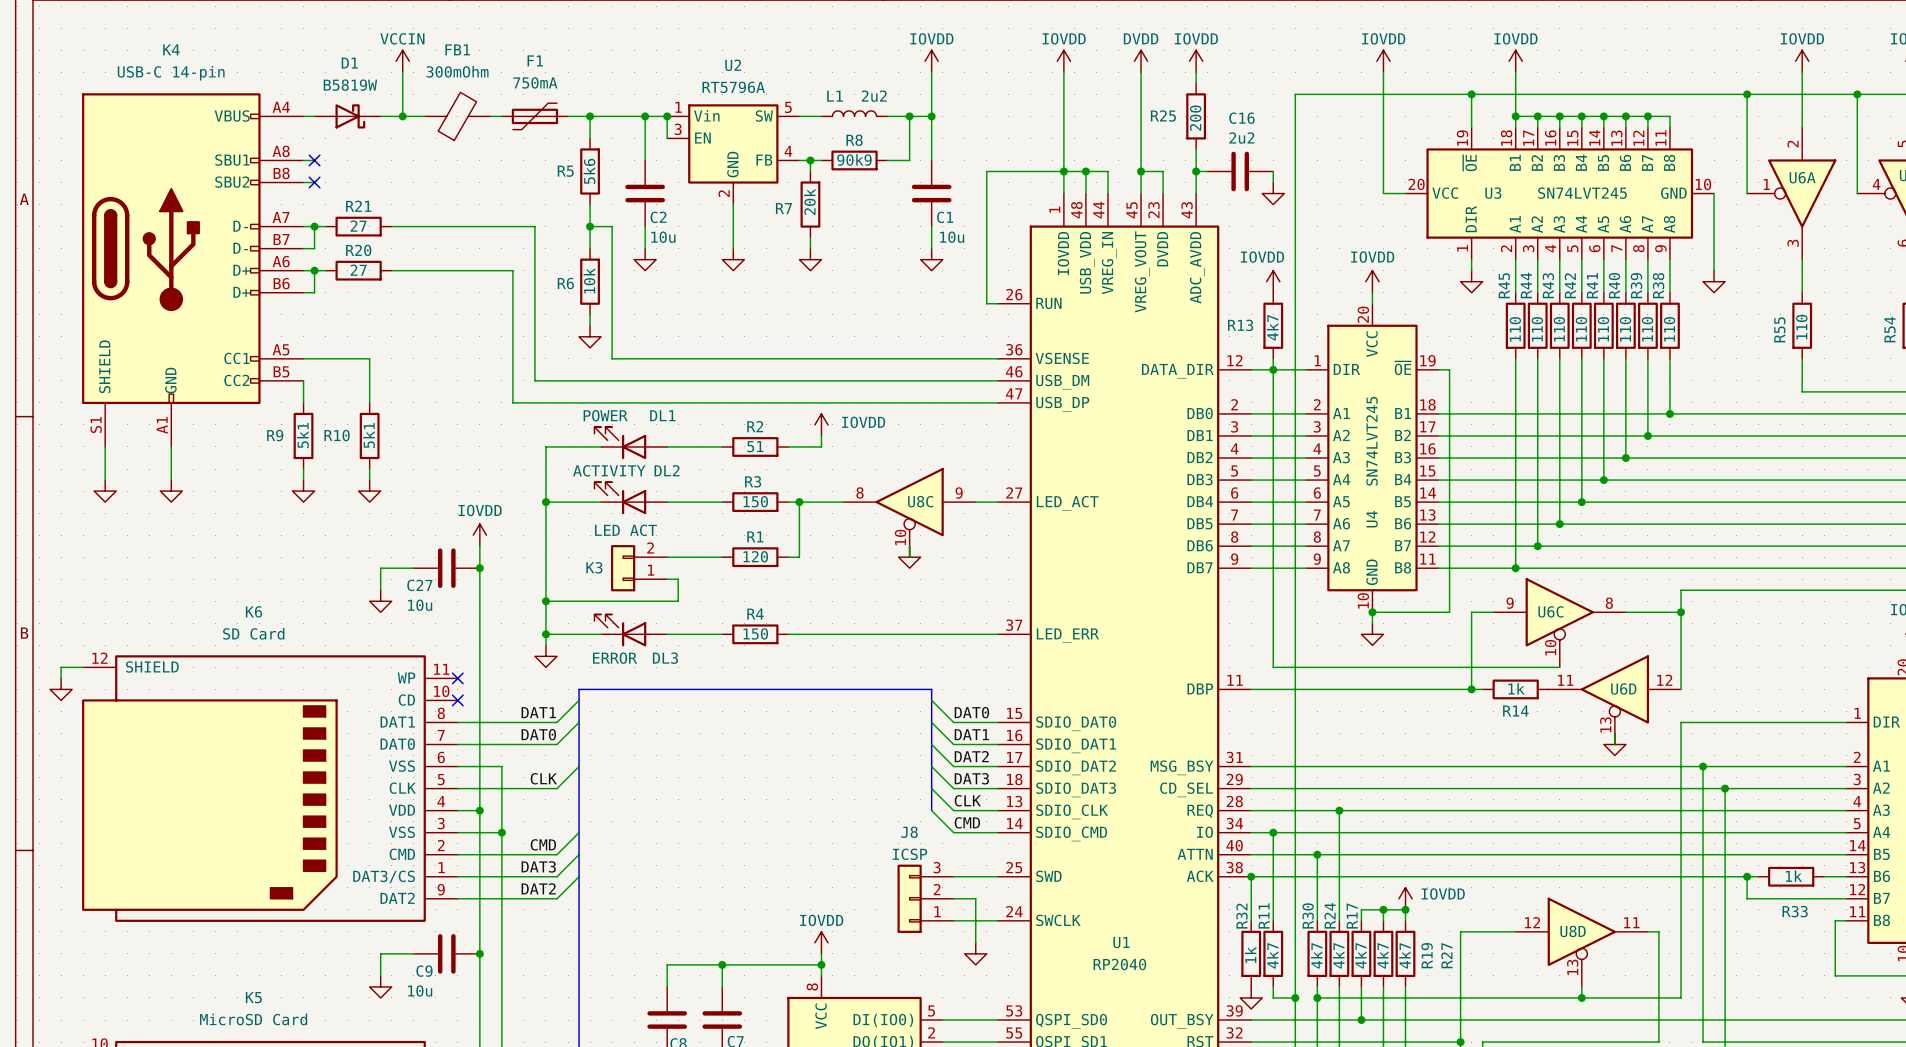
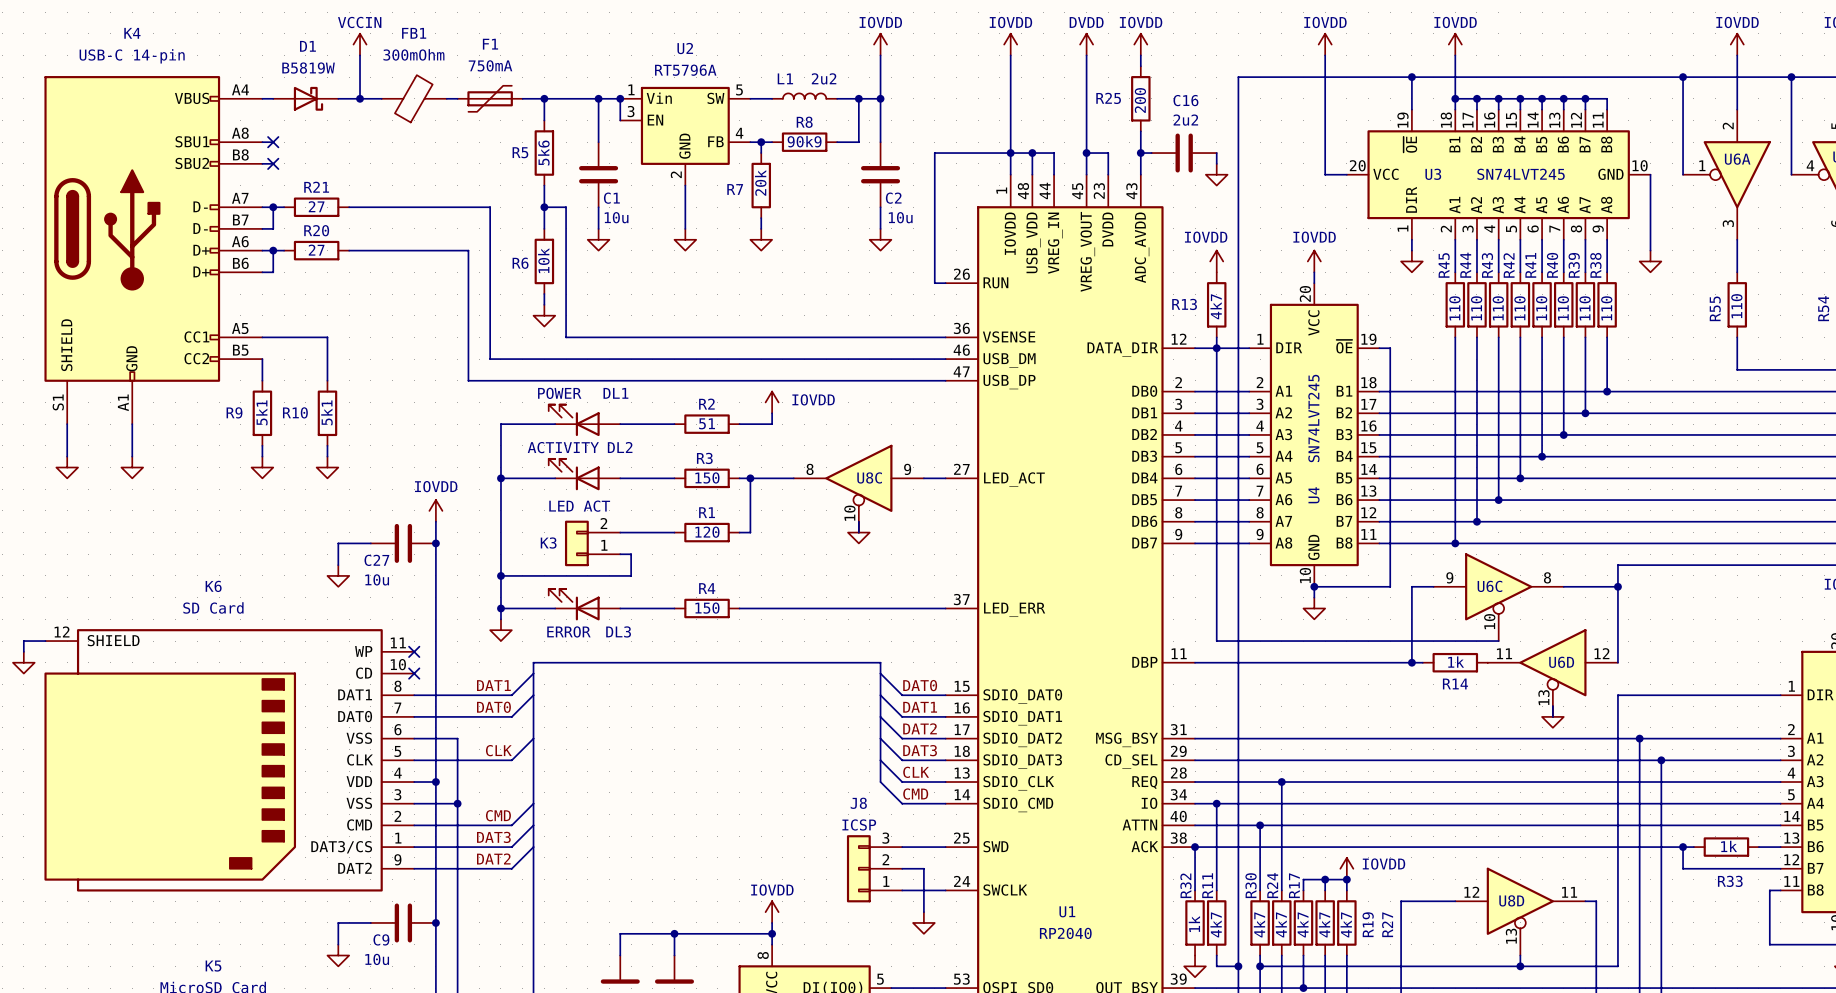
C2 name: C2 (658, 217) -> C1 (611, 198)
C1 name: C1 (945, 217) -> C2 (893, 198)

